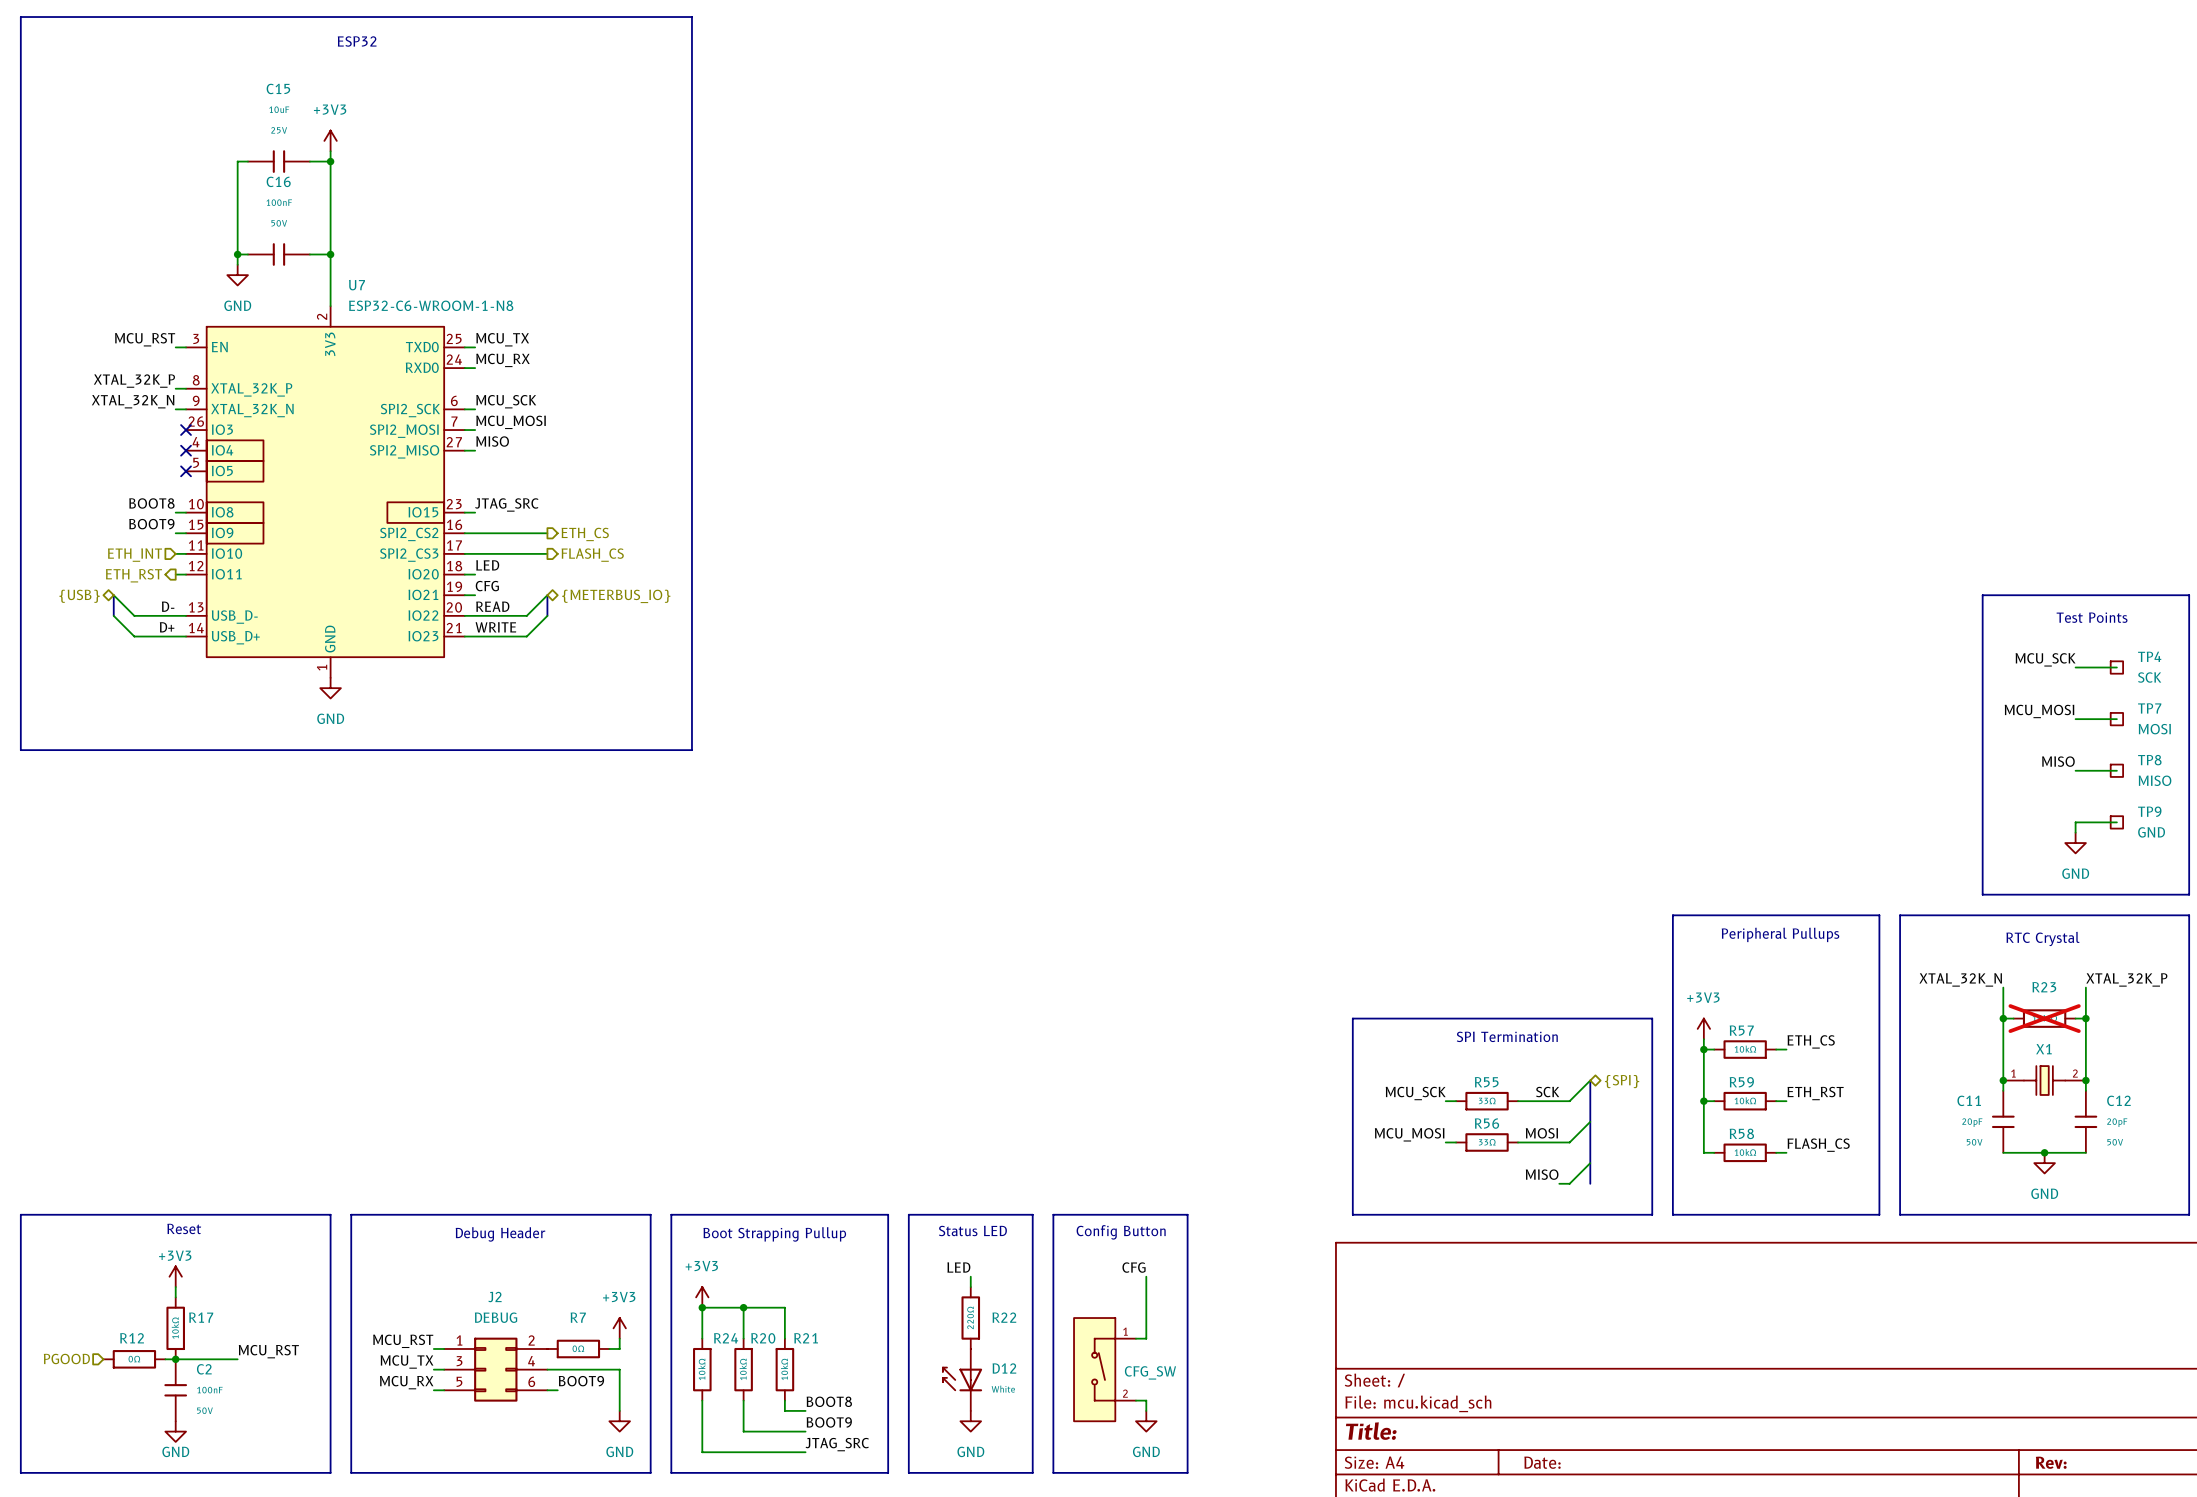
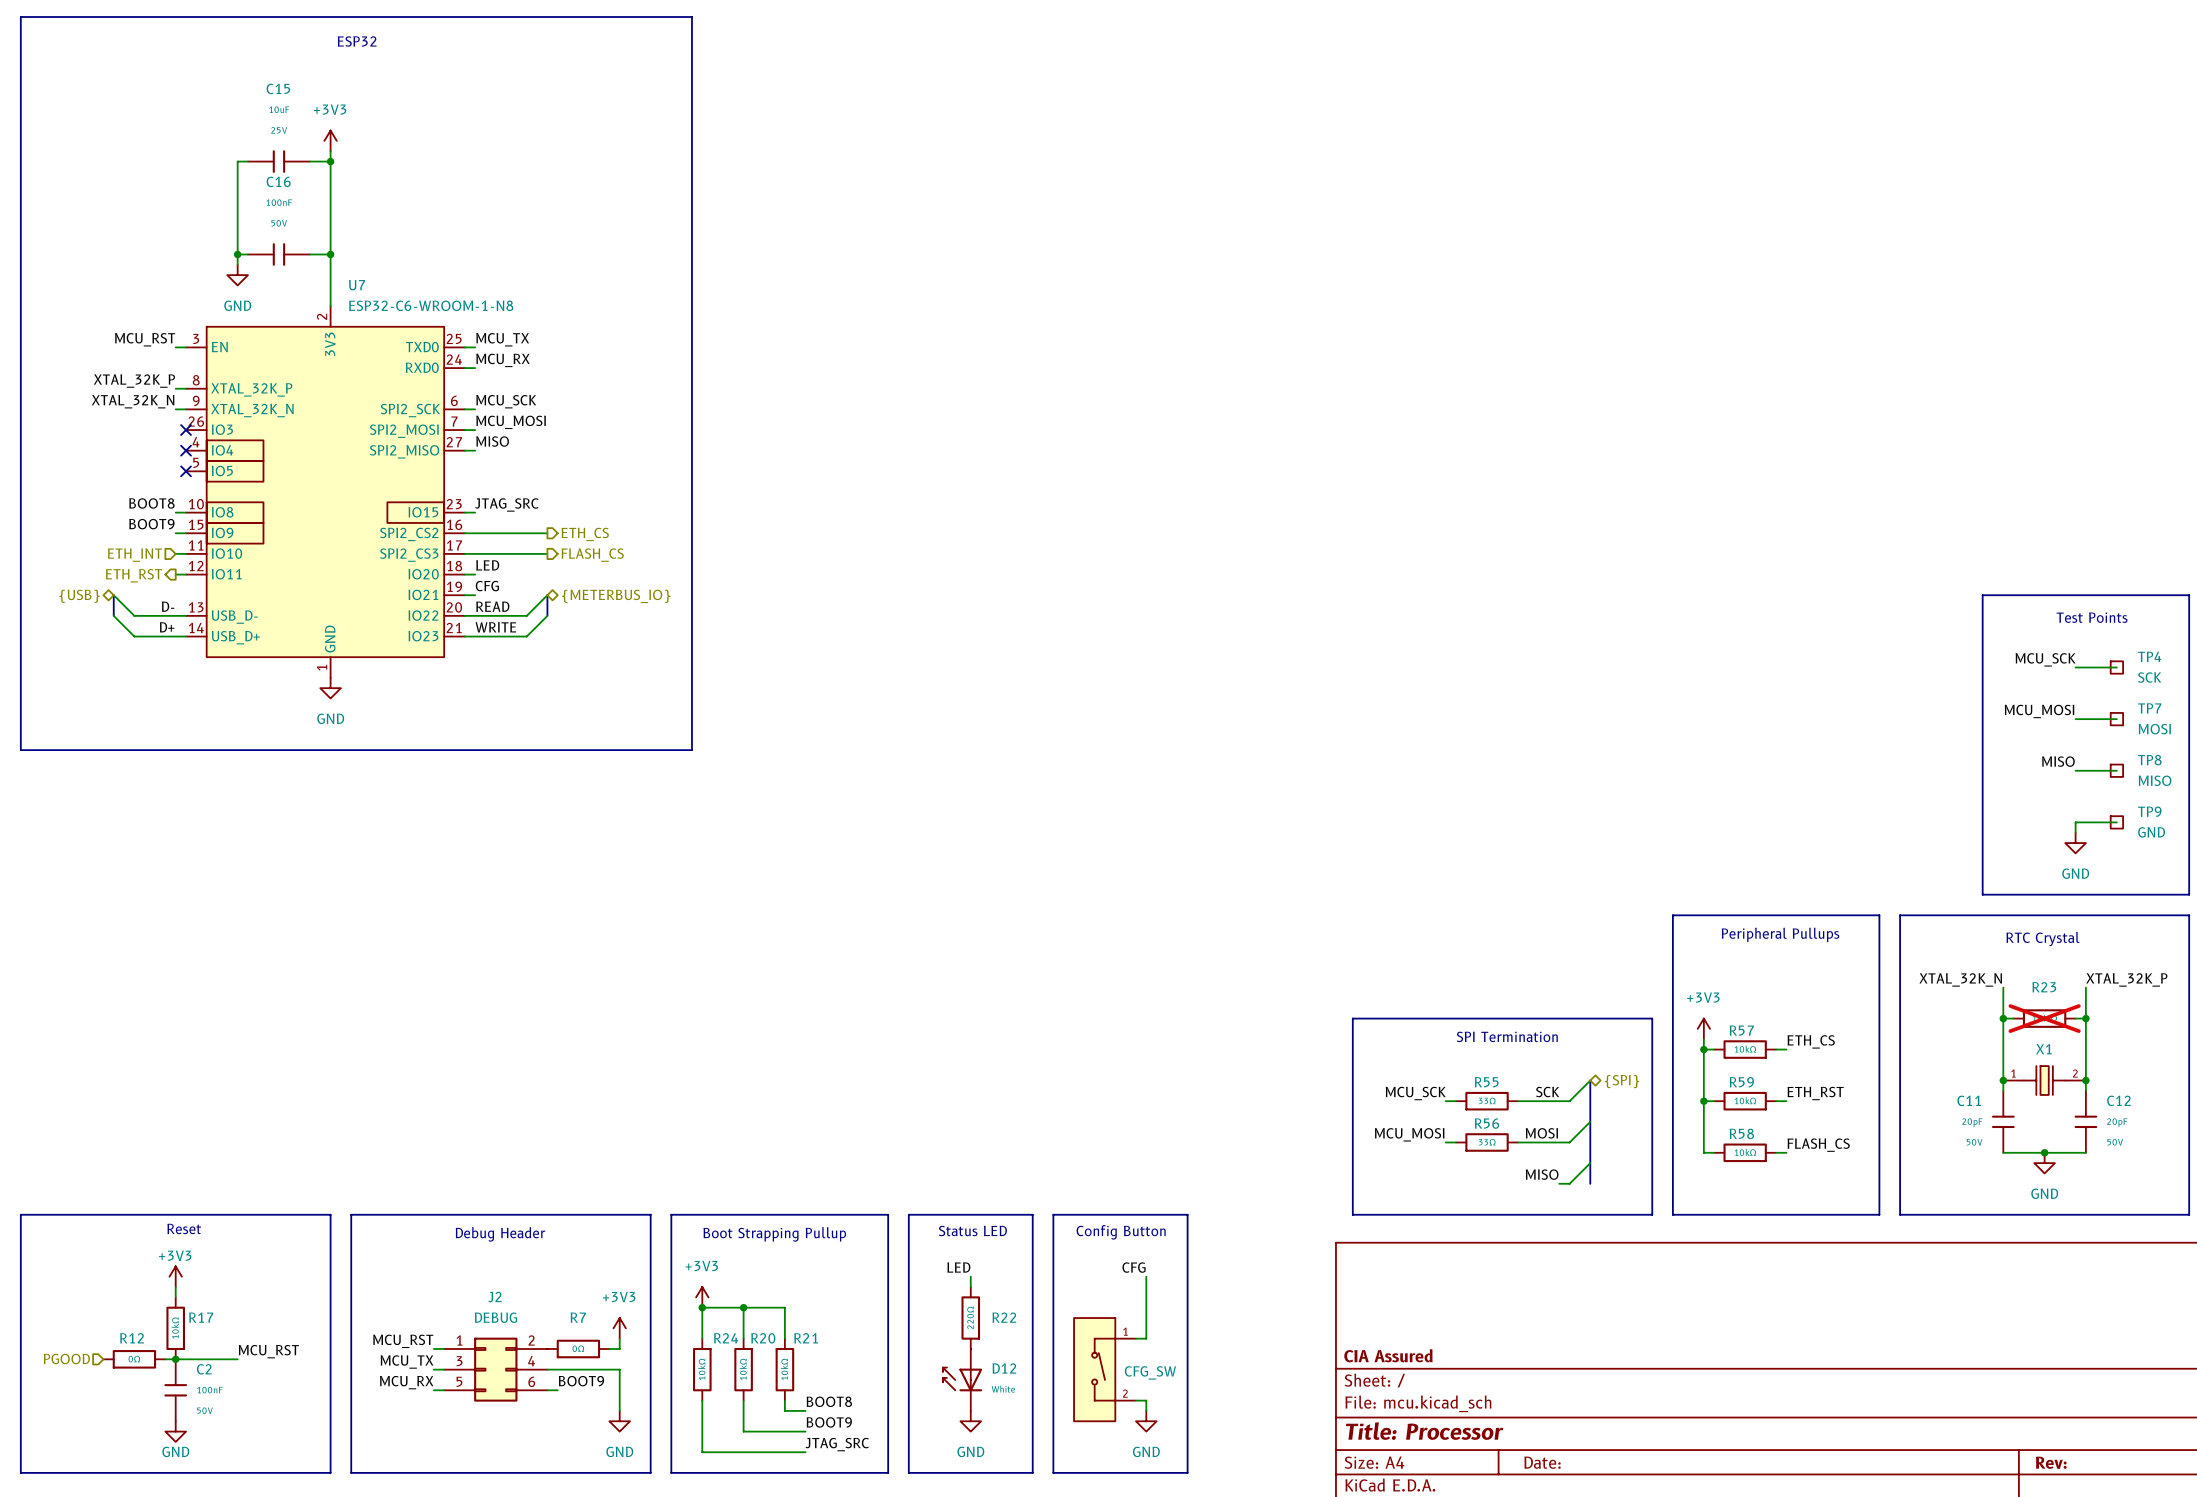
title block: none -> CIA Assured (1388, 1355)
title block: Title: (1371, 1431) -> Title: Processor (1424, 1431)

